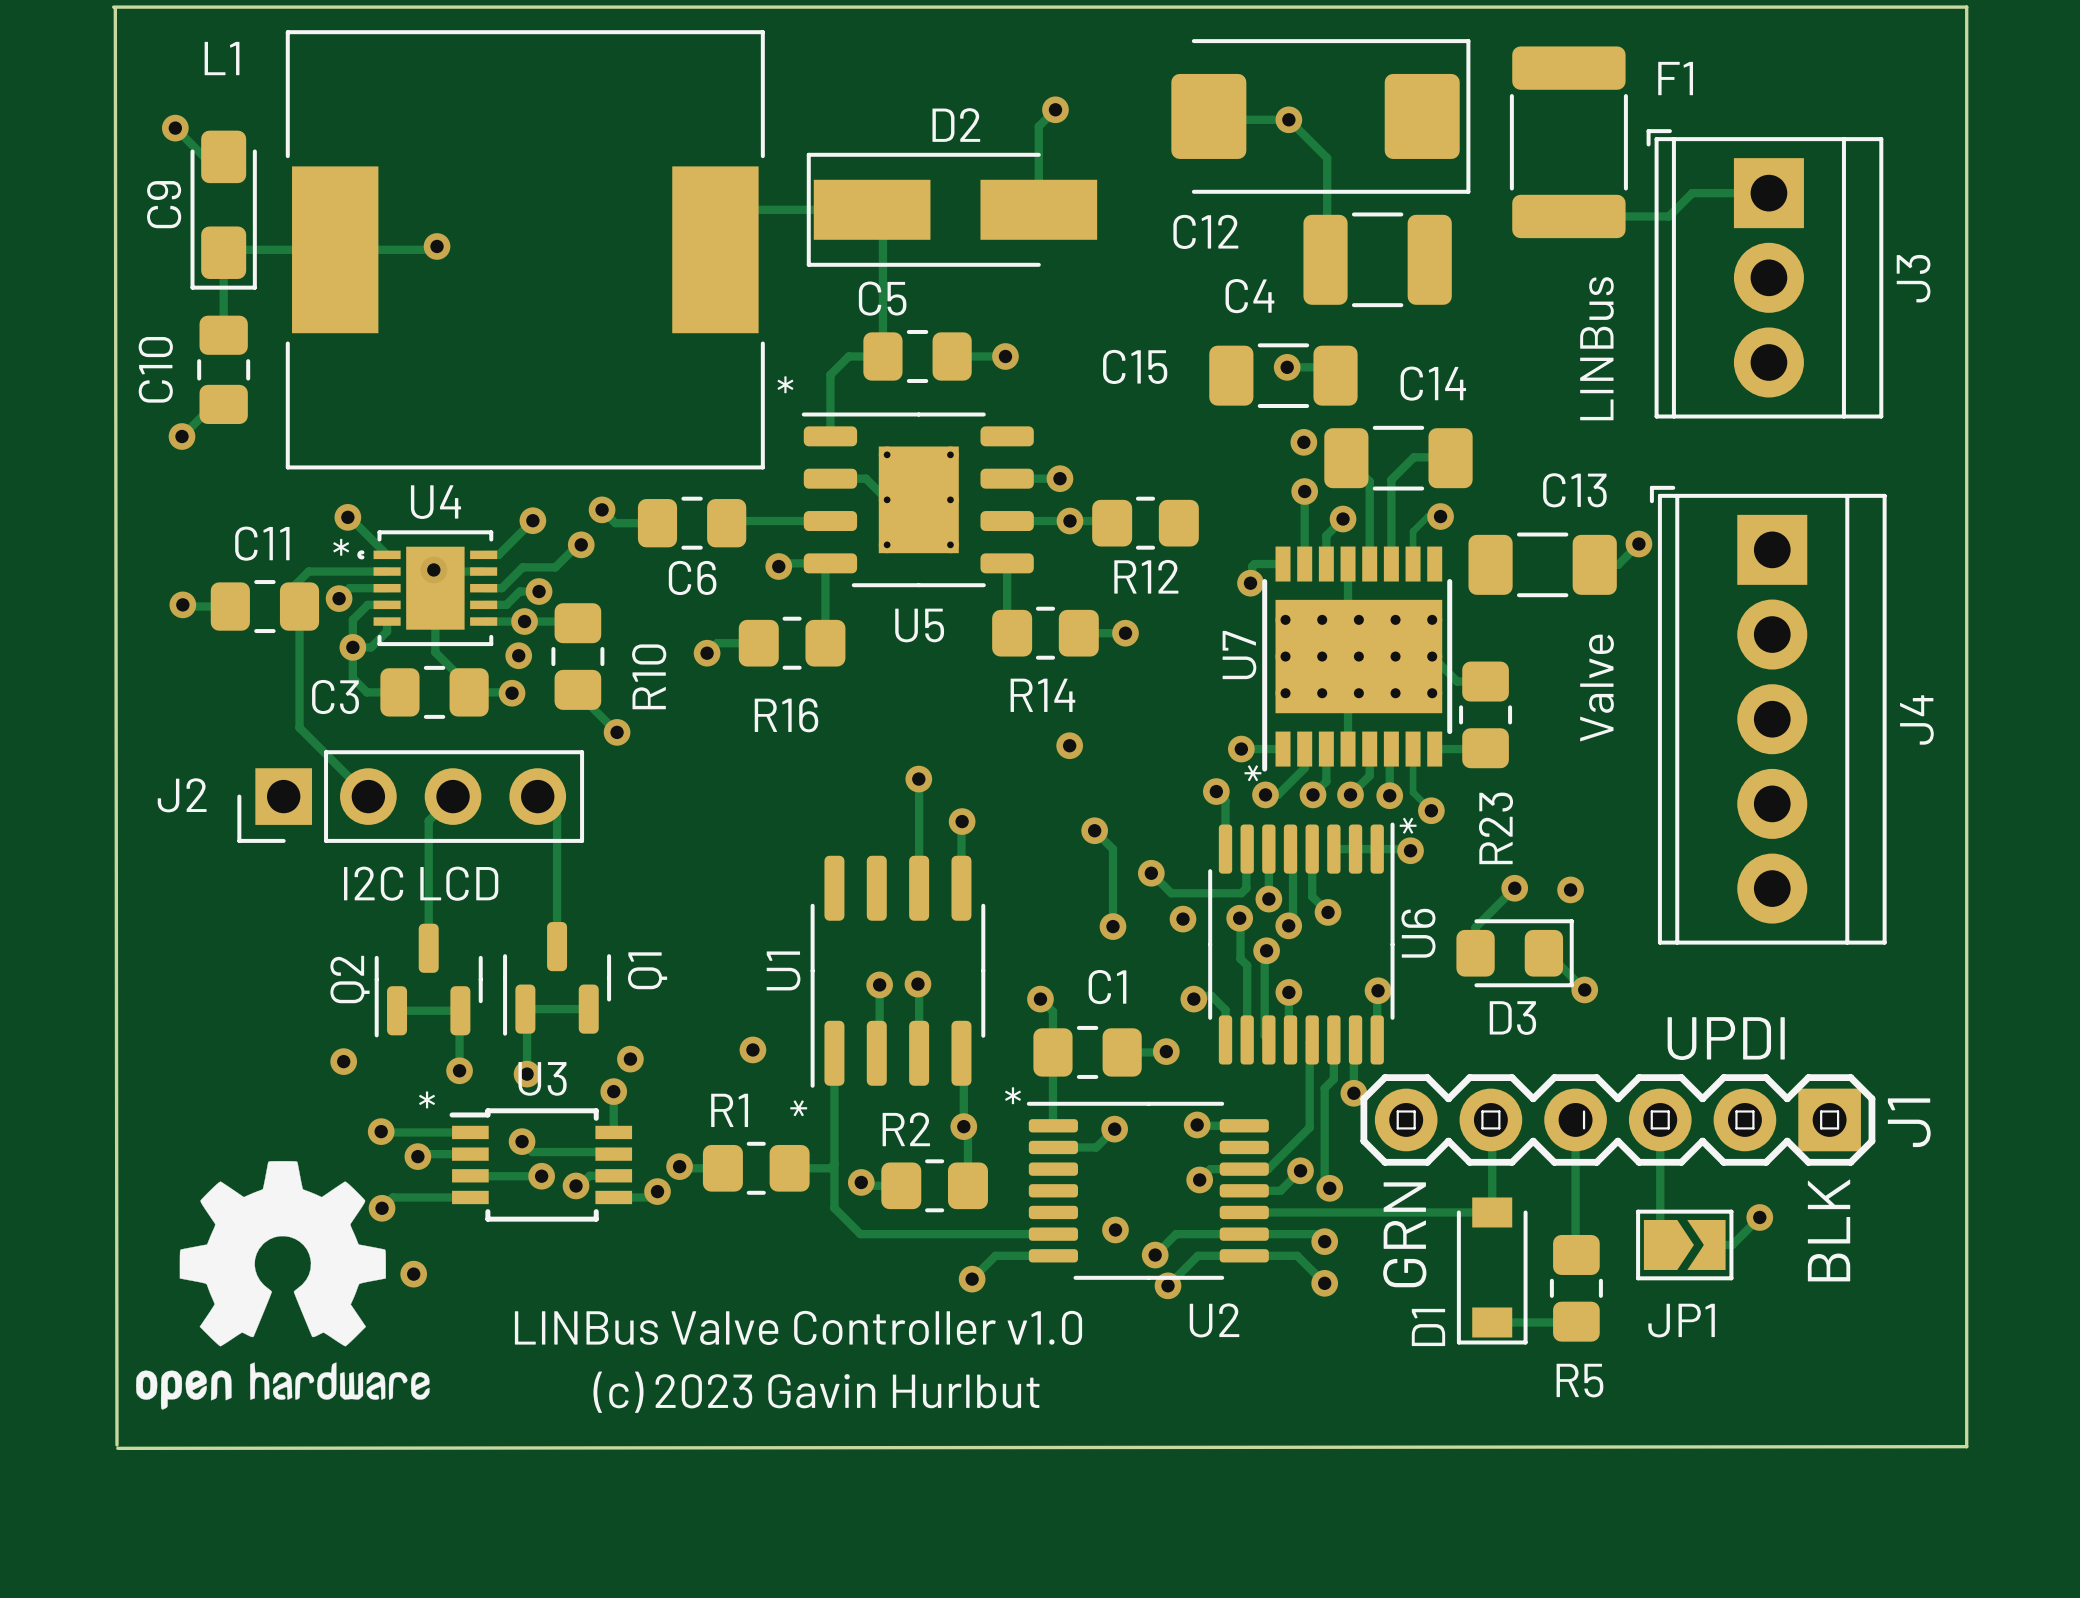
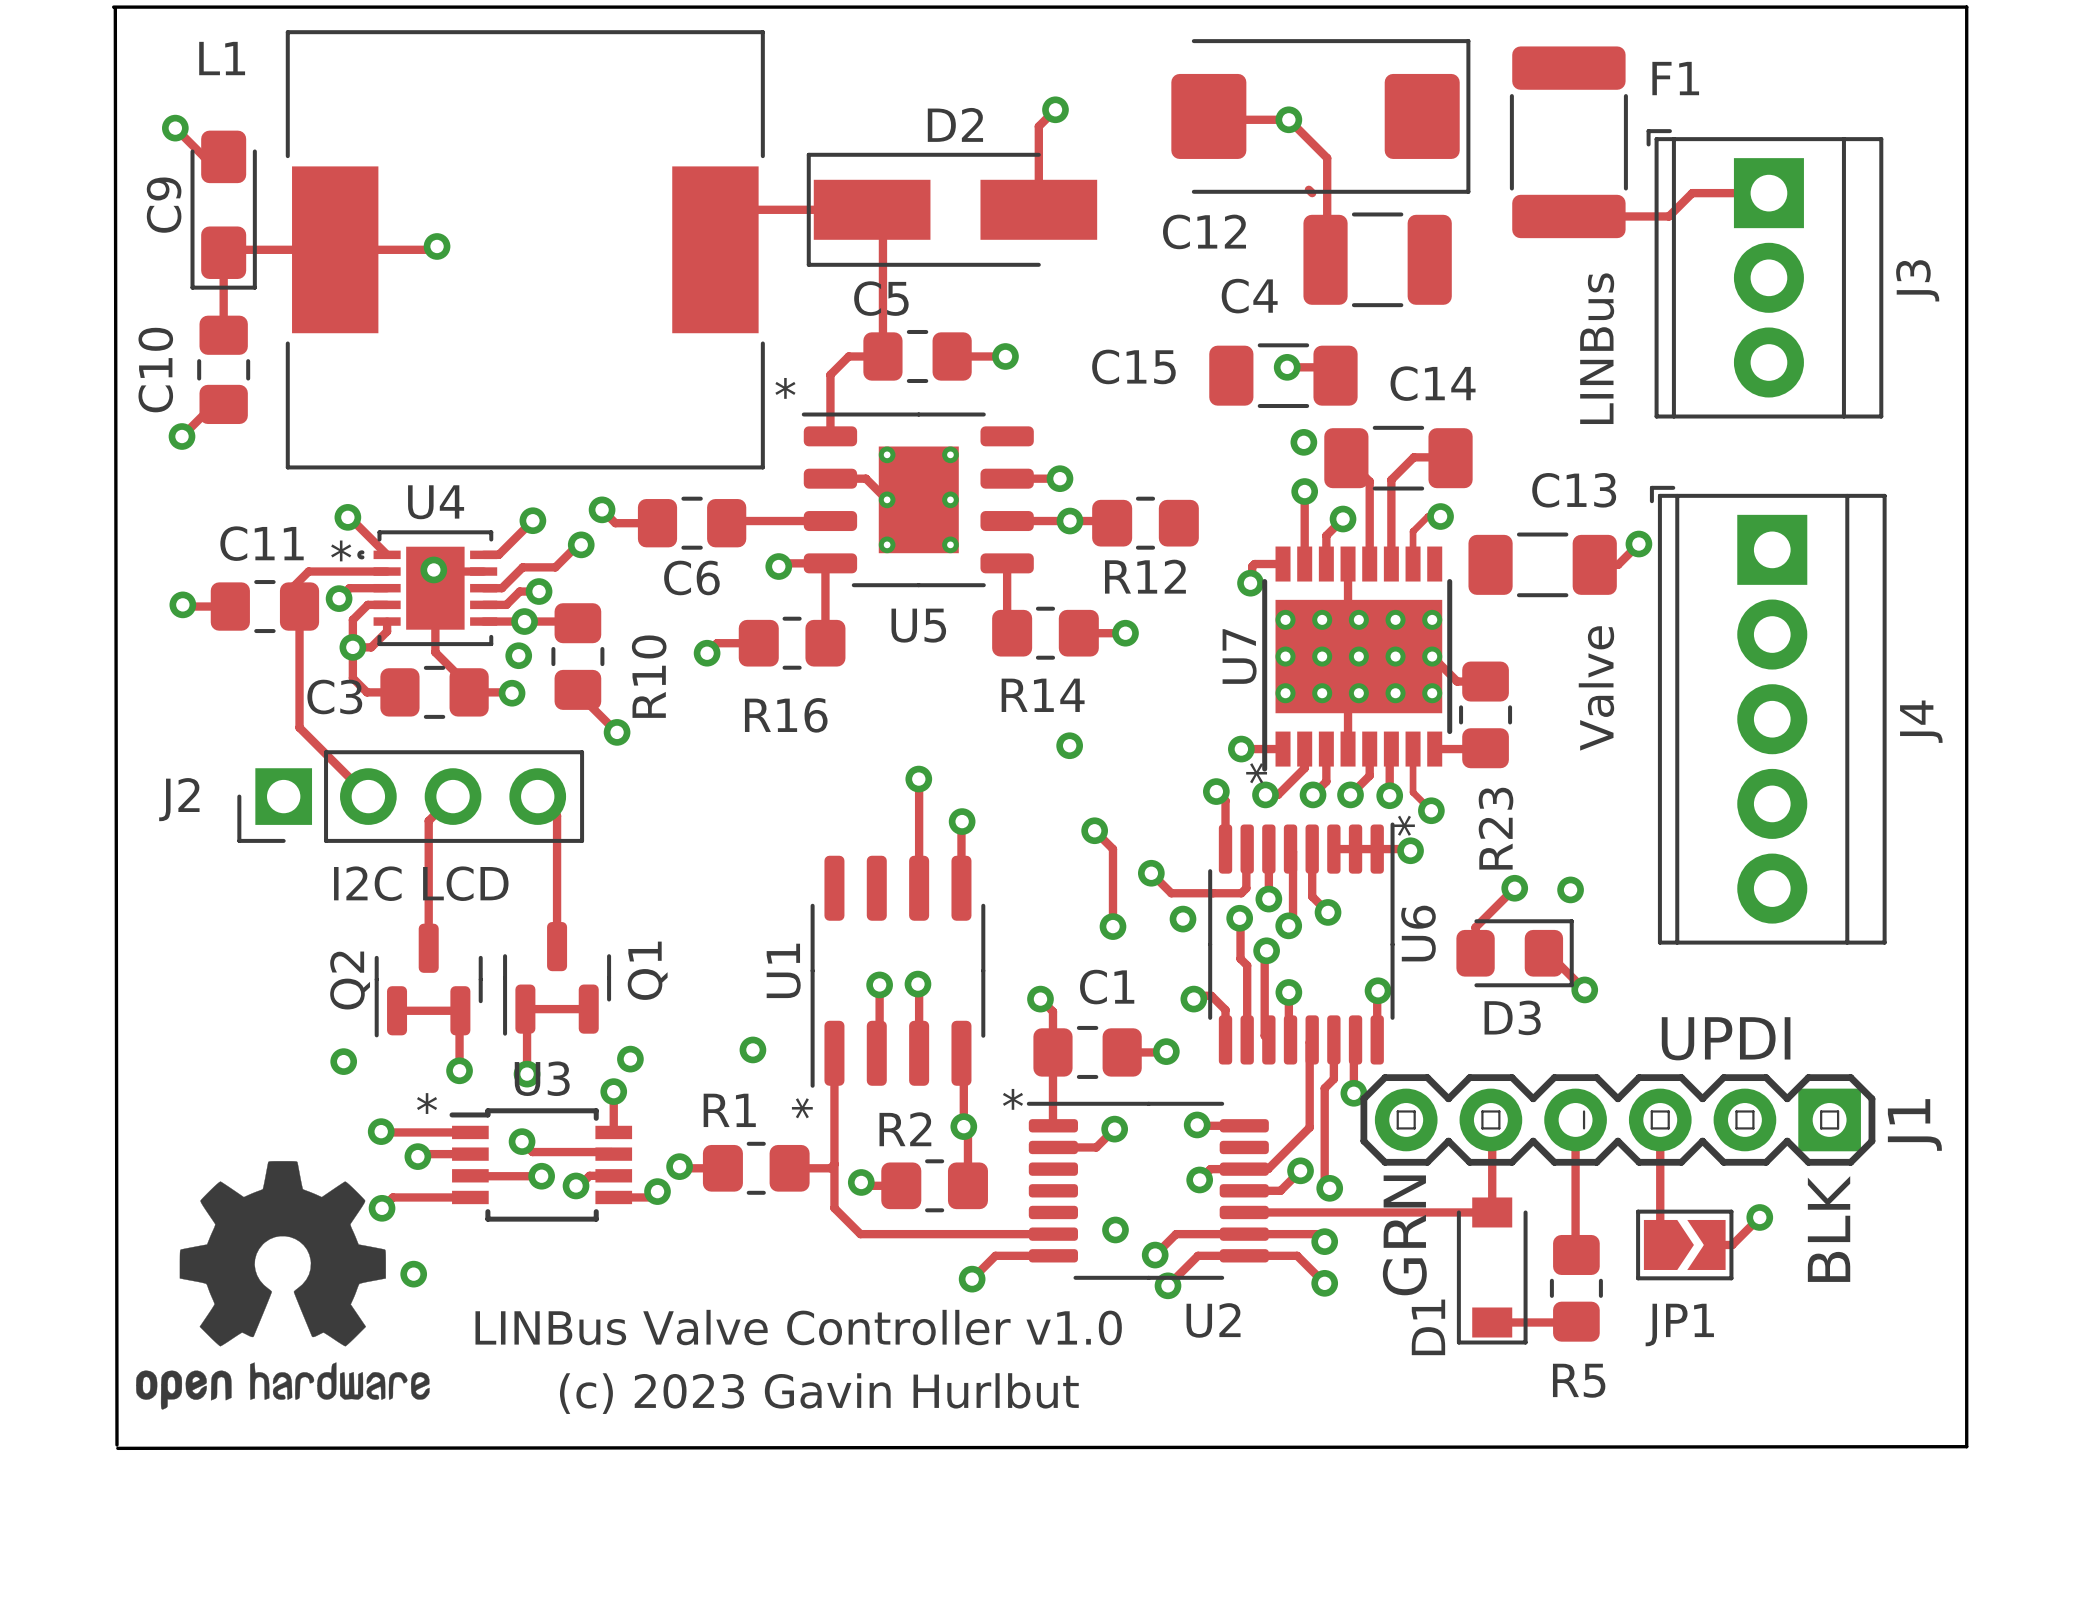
track: none -> (1308, 189) (1312, 193)

